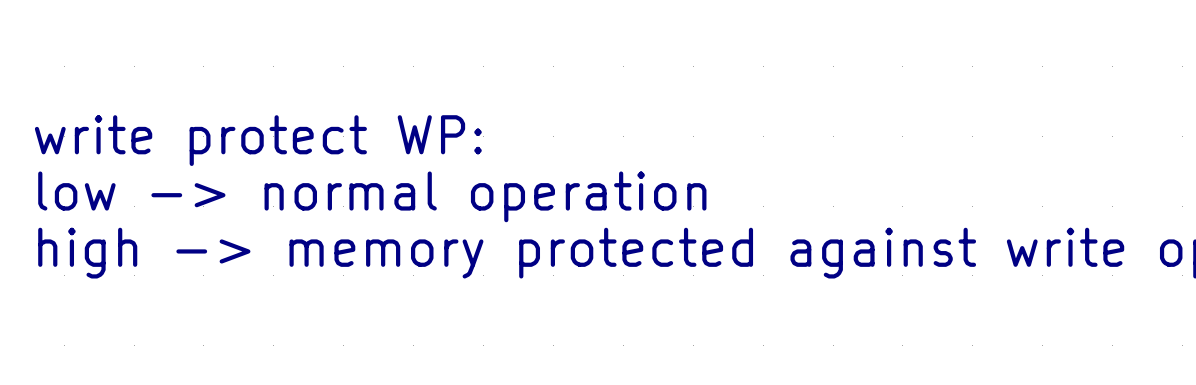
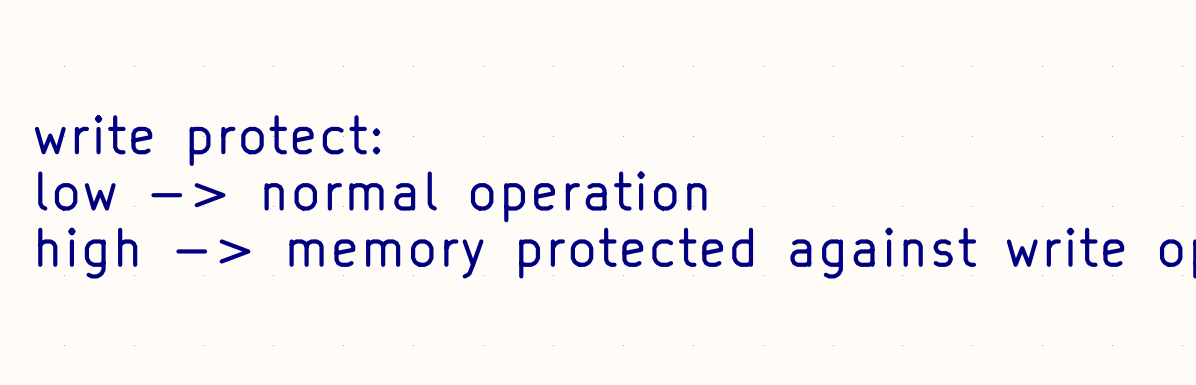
text: write protect WP: (258, 140) -> write protect: (207, 140)

